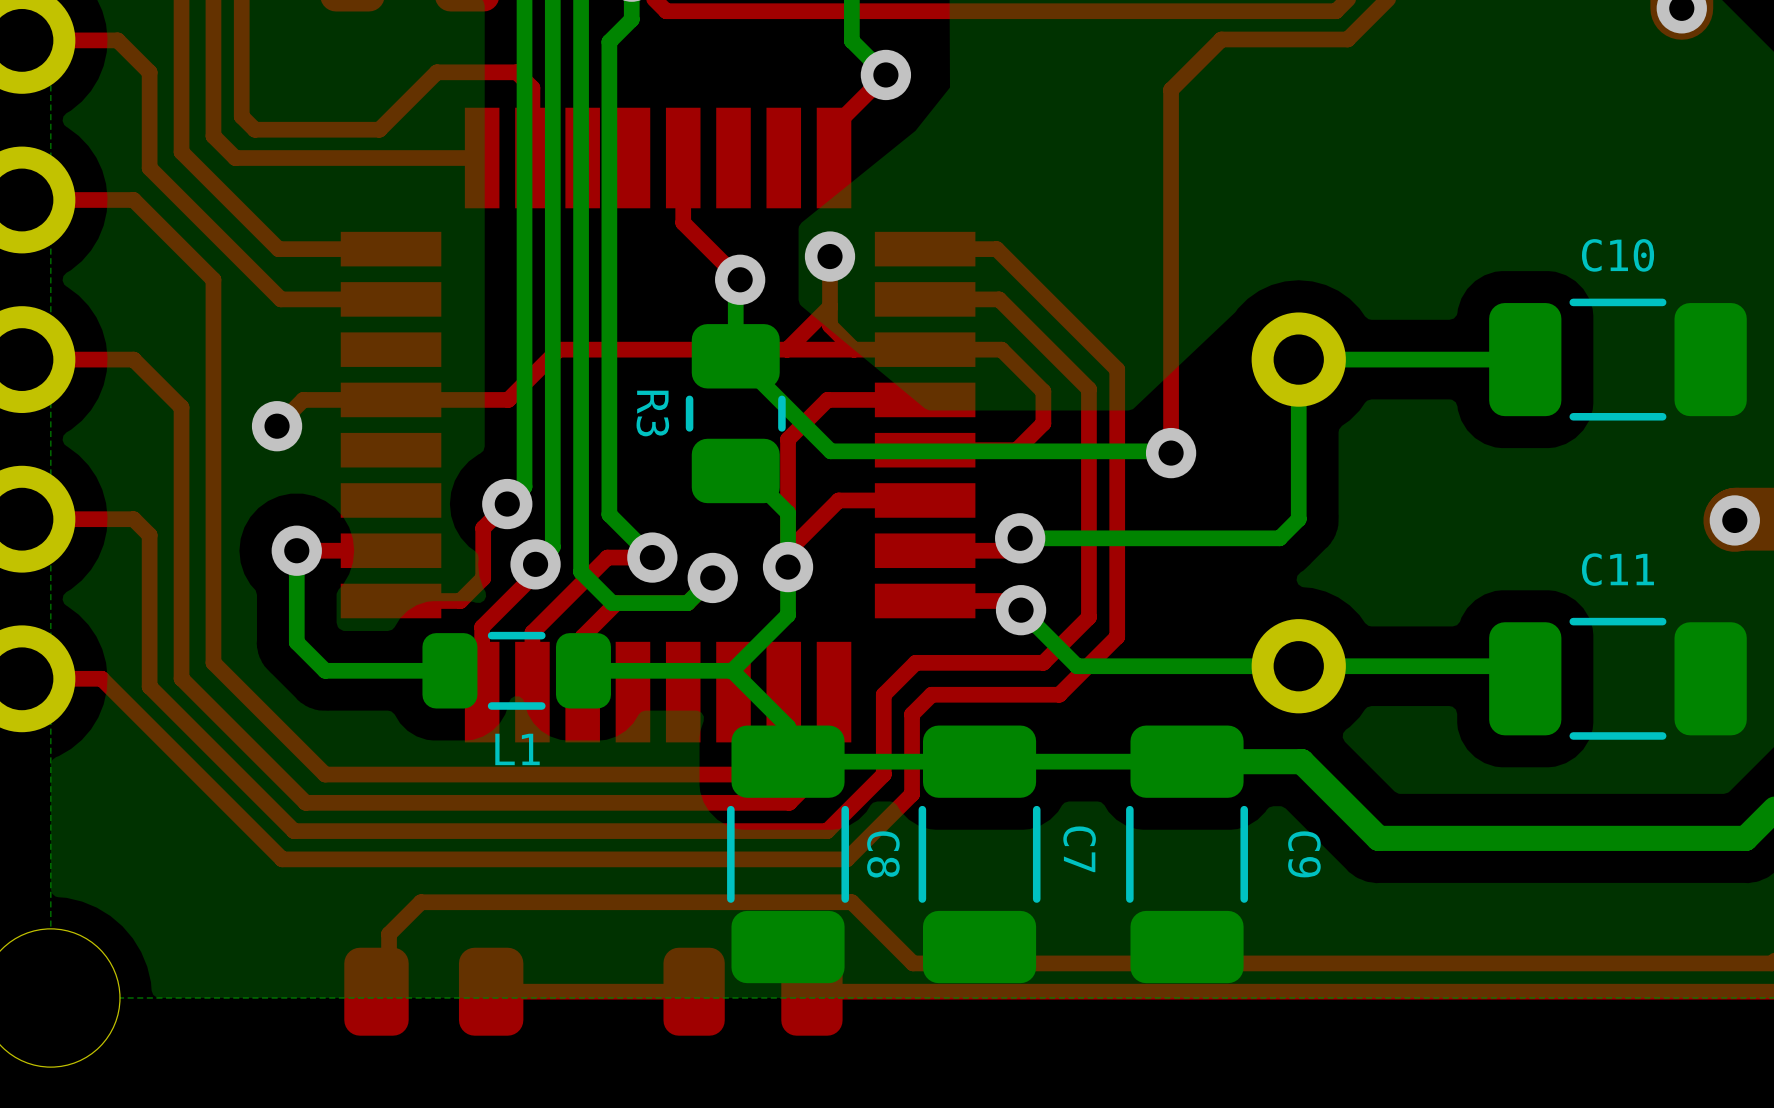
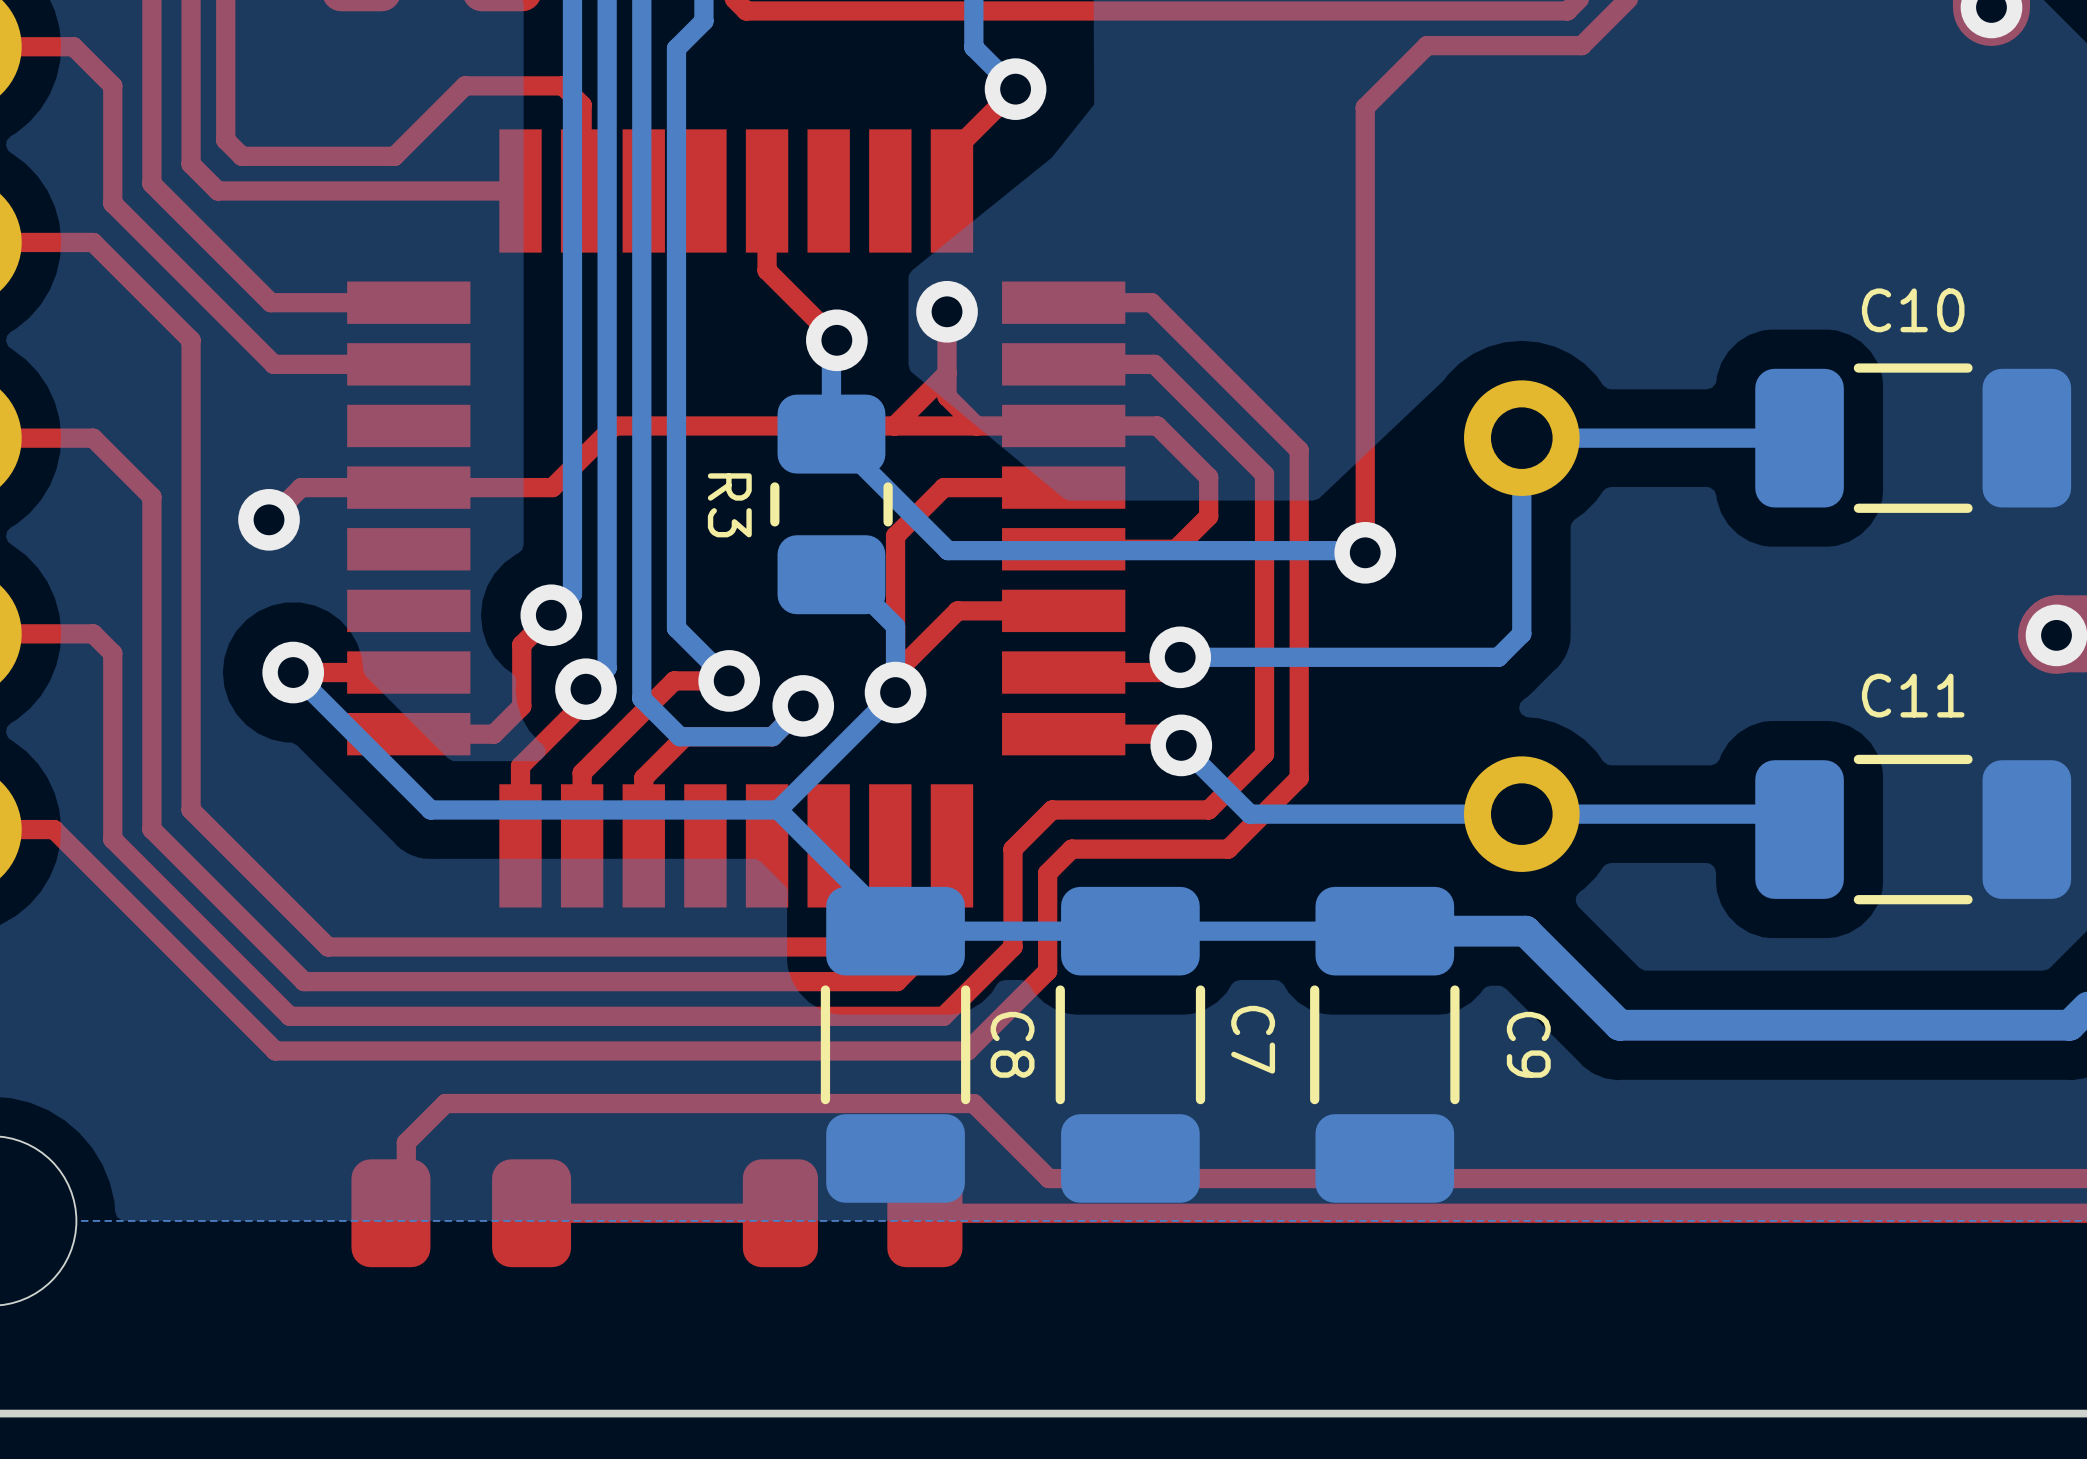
bottom track: (296, 550) (296, 642) (325, 670) (449, 670) -> (293, 672) (430, 809) (778, 809)
bottom track: (788, 567) (788, 614) (732, 670) -> (895, 692) (778, 809)
L1: (516, 670) -> none
bottom track: (732, 670) (788, 726) (788, 758) -> (778, 809) (895, 927)
bottom track: (732, 670) (583, 670) -> none

